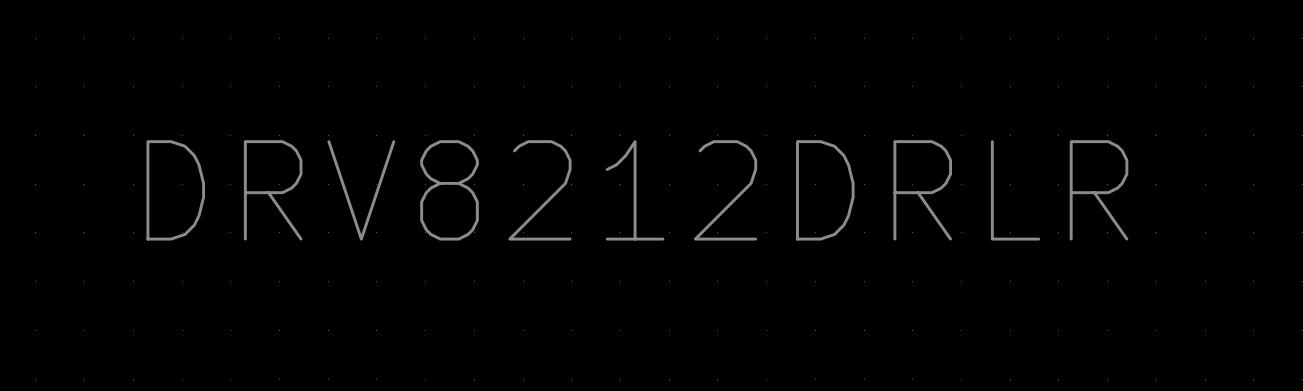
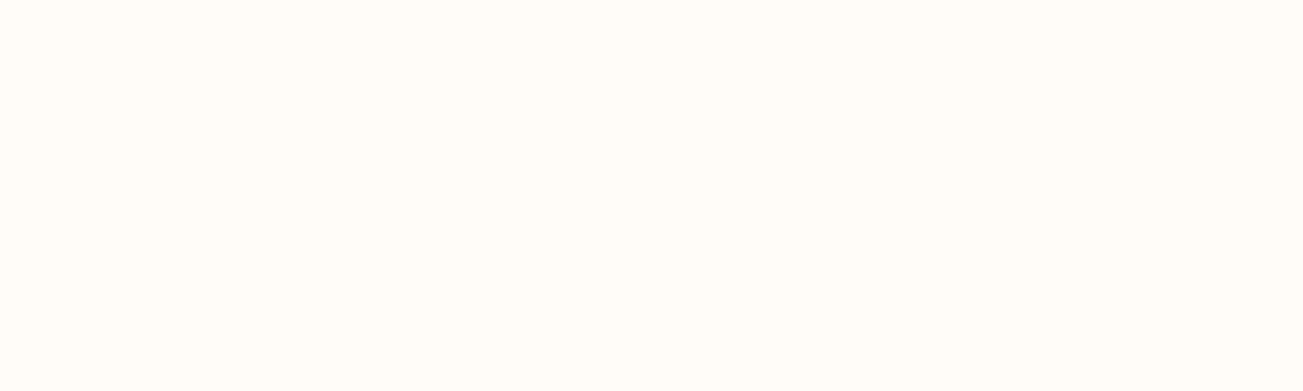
text: DRV8212DRLR (637, 190) -> none

